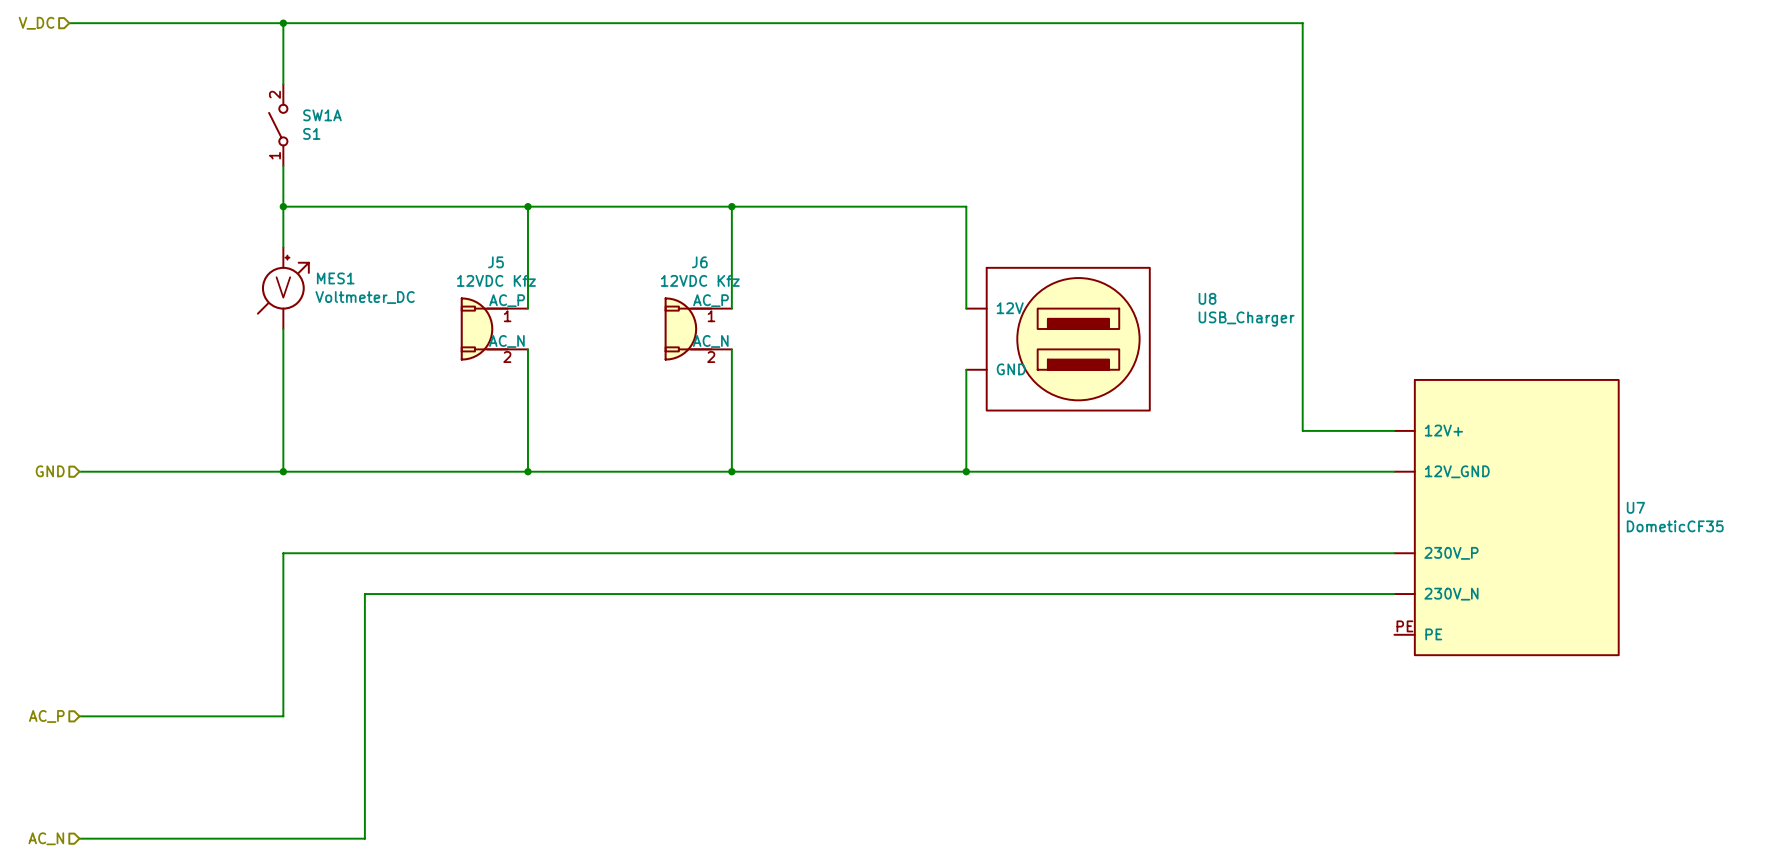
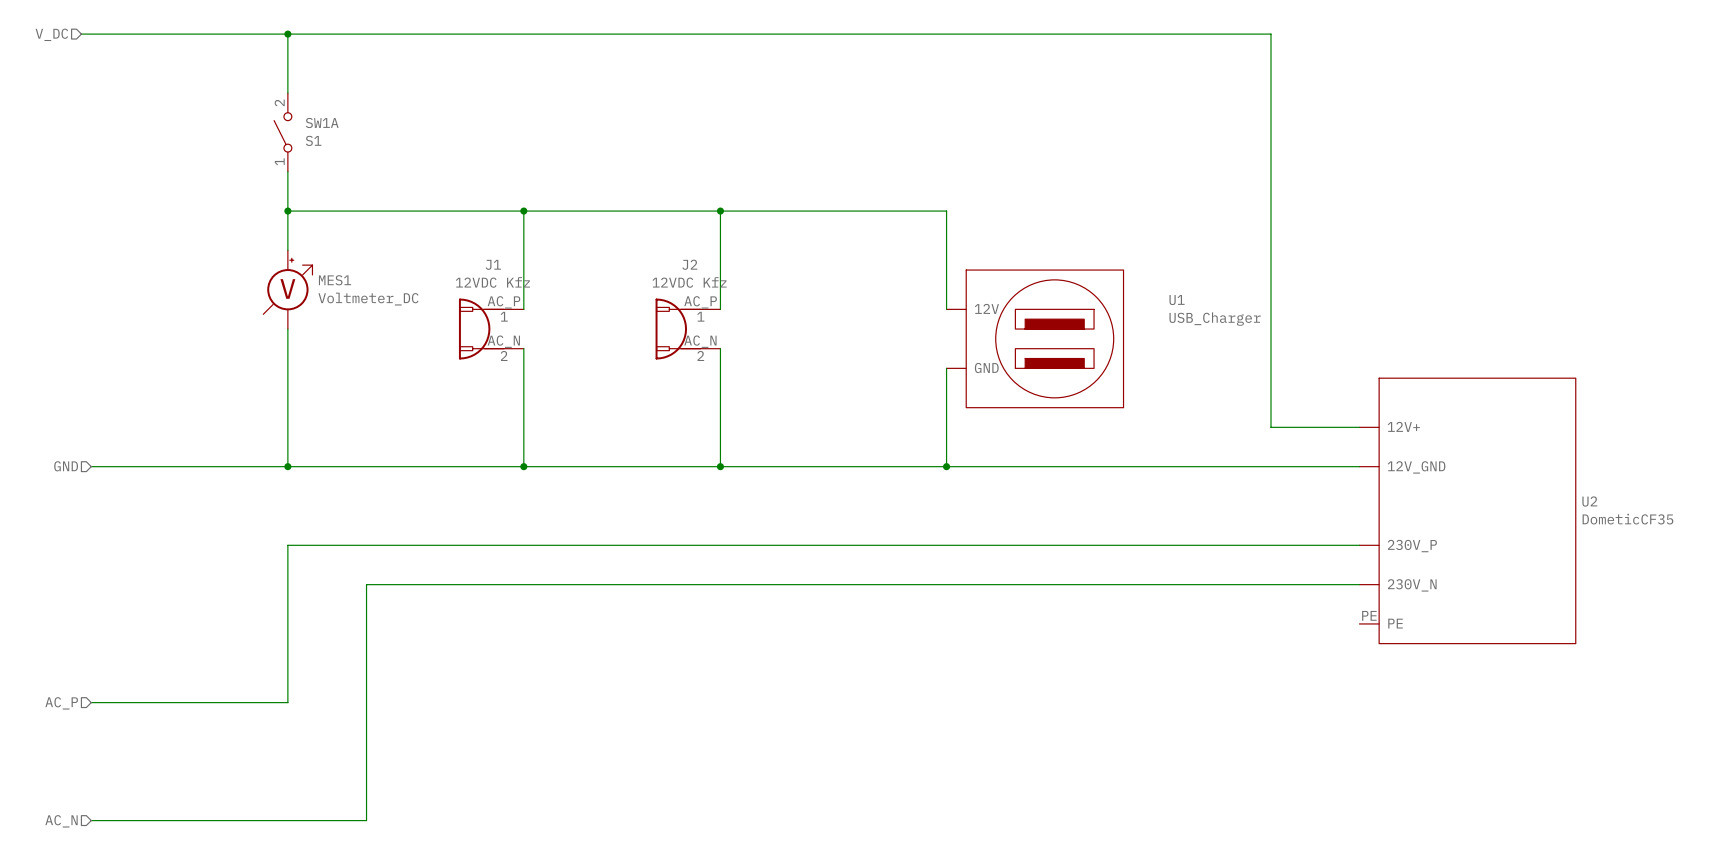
J5 name: J5 (495, 262) -> J1 (493, 264)
J6 name: J6 (699, 262) -> J2 (689, 264)
U8 name: U8 (1207, 298) -> U1 (1177, 300)
U7 name: U7 (1635, 507) -> U2 (1589, 501)

